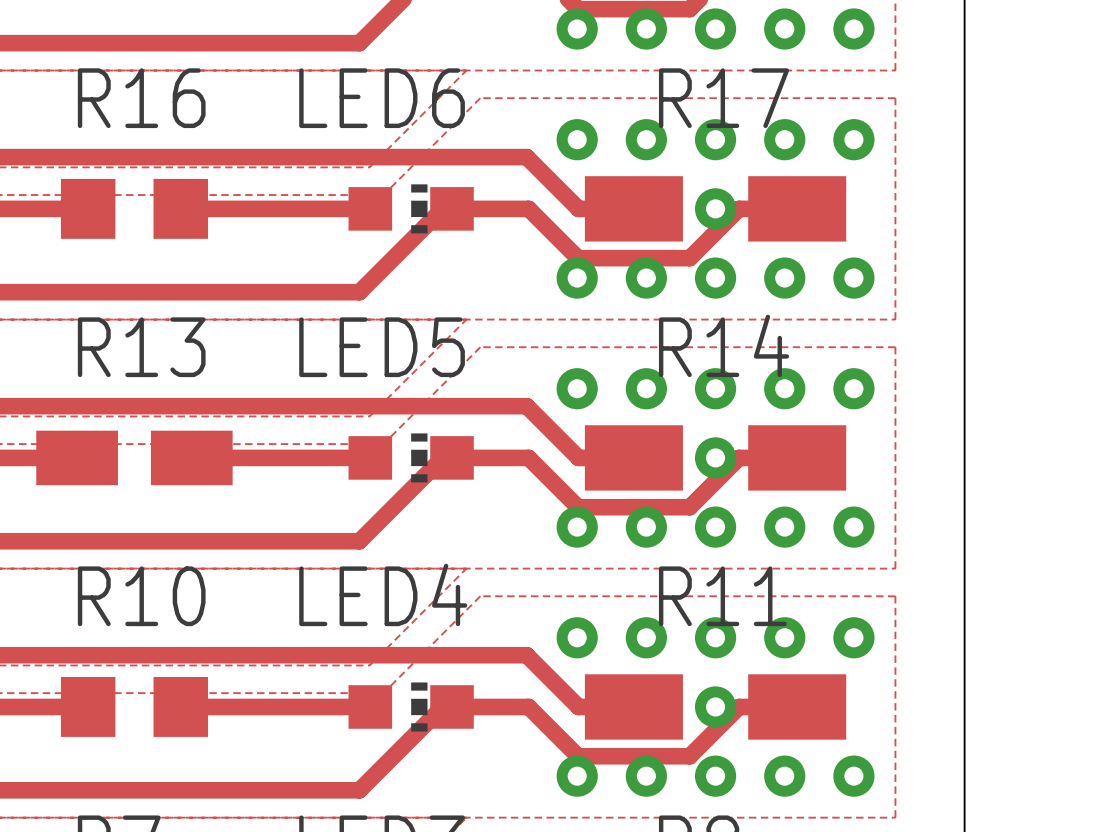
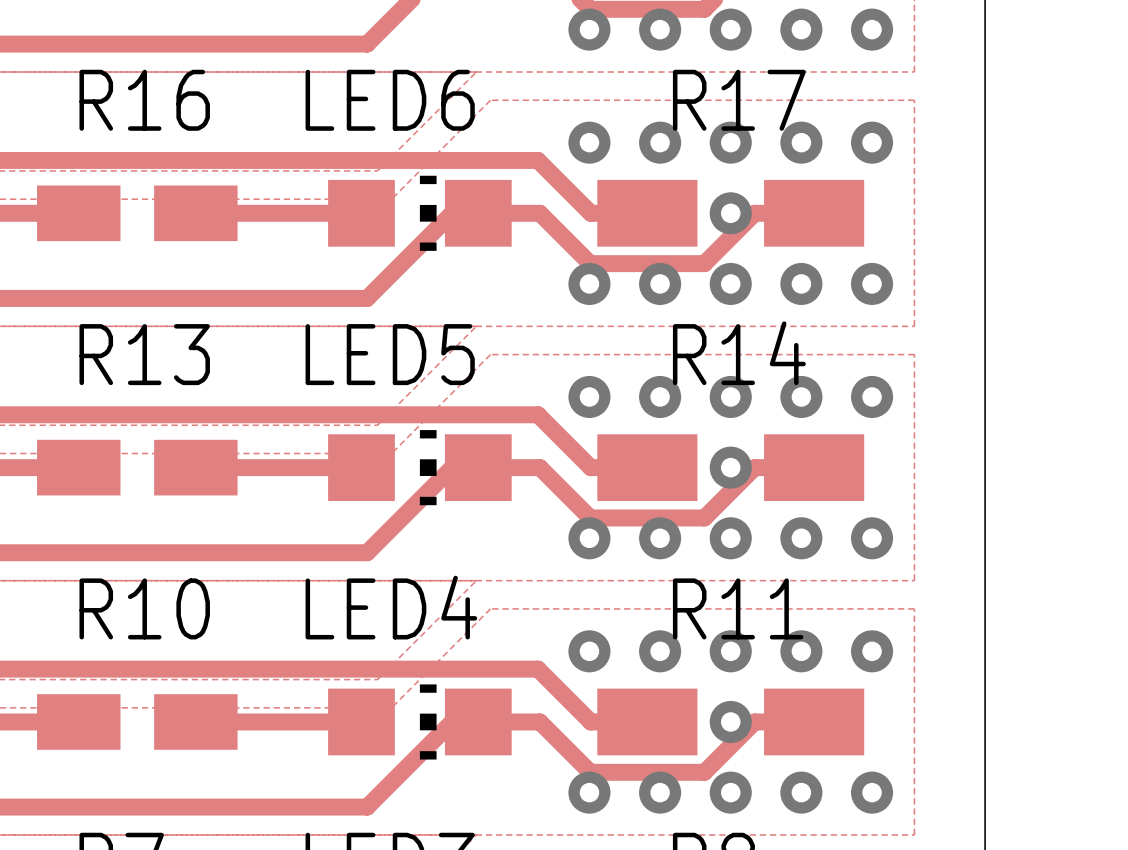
R16 footprint: [60, 178, 208, 239] -> [37, 185, 238, 242]
LED6 footprint: [348, 184, 474, 234] -> [328, 175, 512, 251]
LED5 footprint: [348, 433, 474, 483] -> [328, 430, 512, 506]
R10 footprint: [60, 677, 208, 737] -> [37, 694, 238, 750]
LED4 footprint: [348, 682, 474, 732] -> [328, 684, 512, 760]

